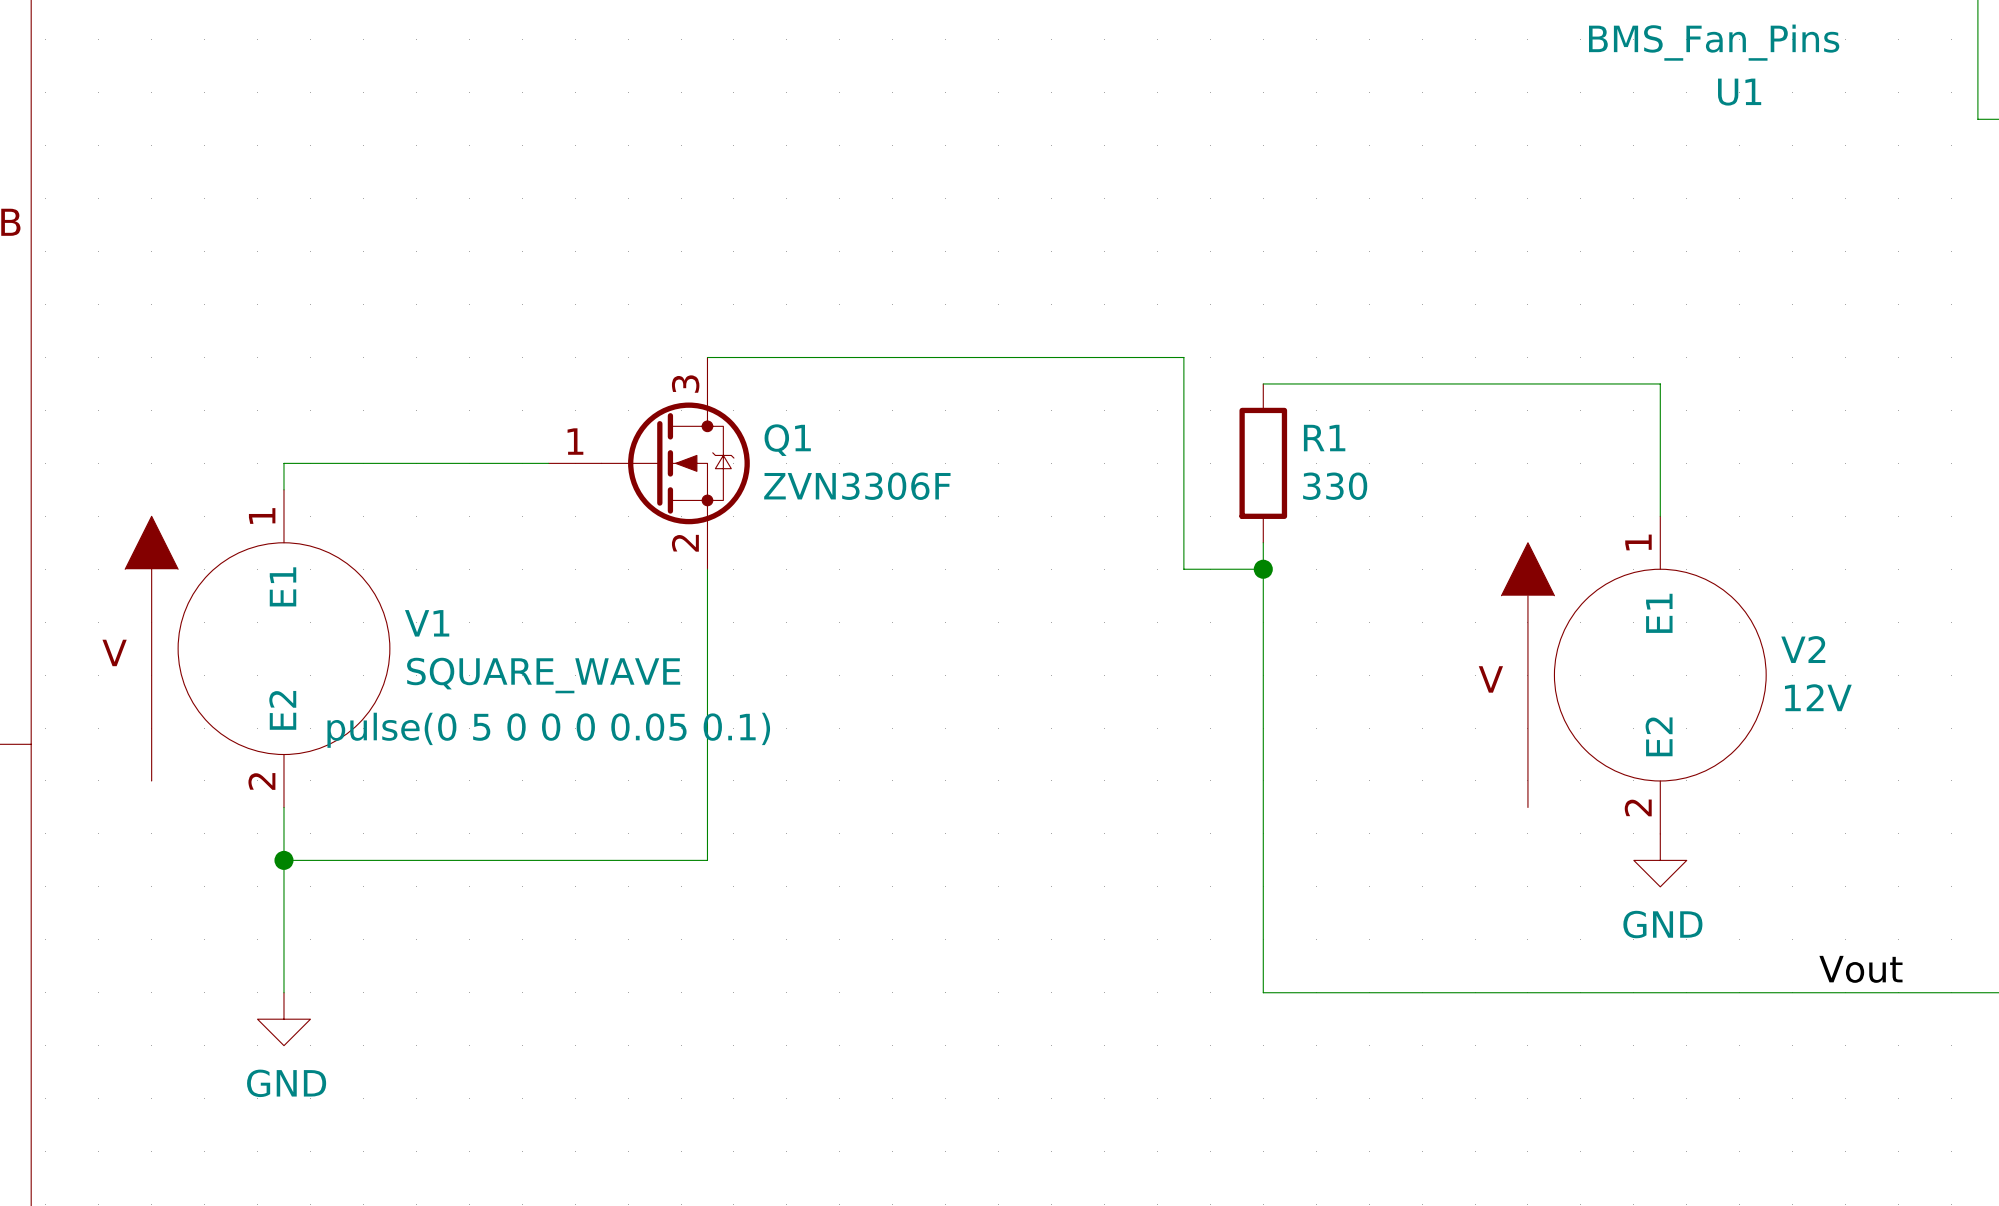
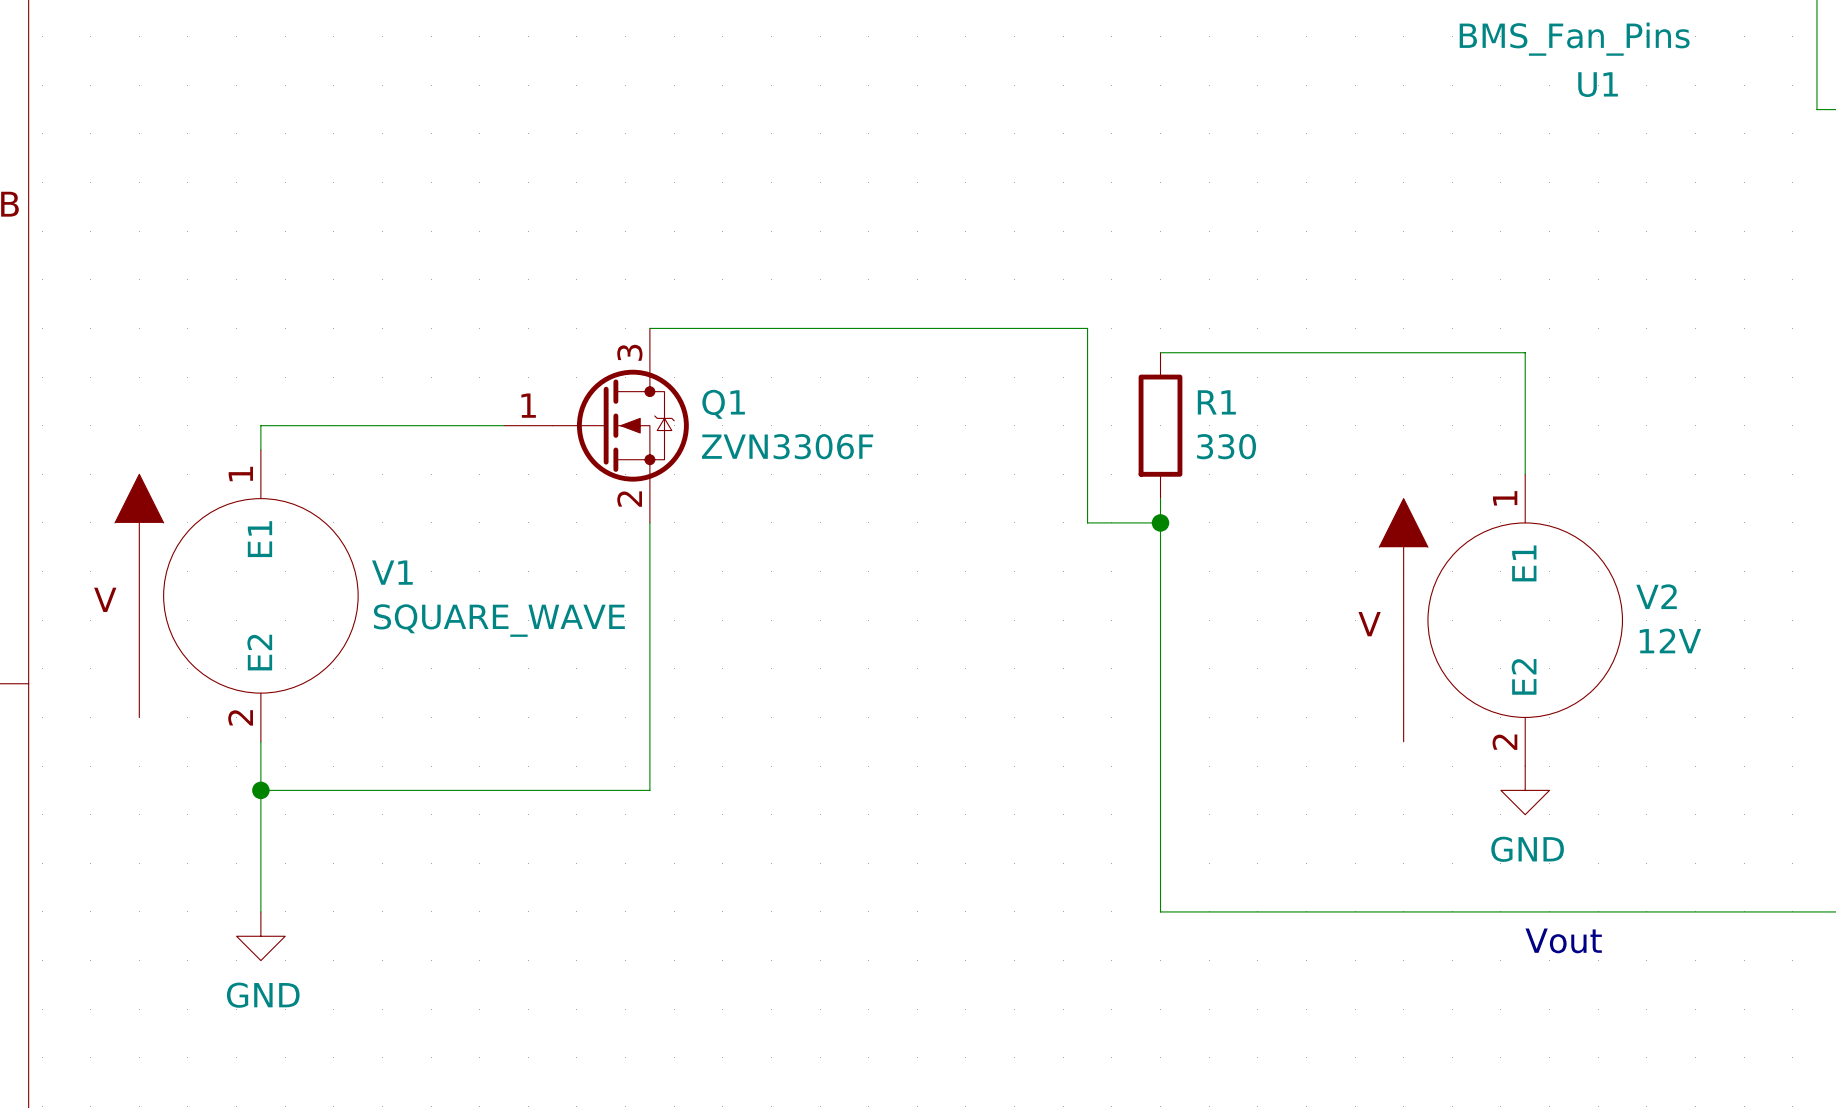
V1 text: pulse(0 5 0 0 0 0.05 0.1) (548, 730) -> none
label: Vout (1860, 969) -> none
text: none -> Vout (1563, 940)

